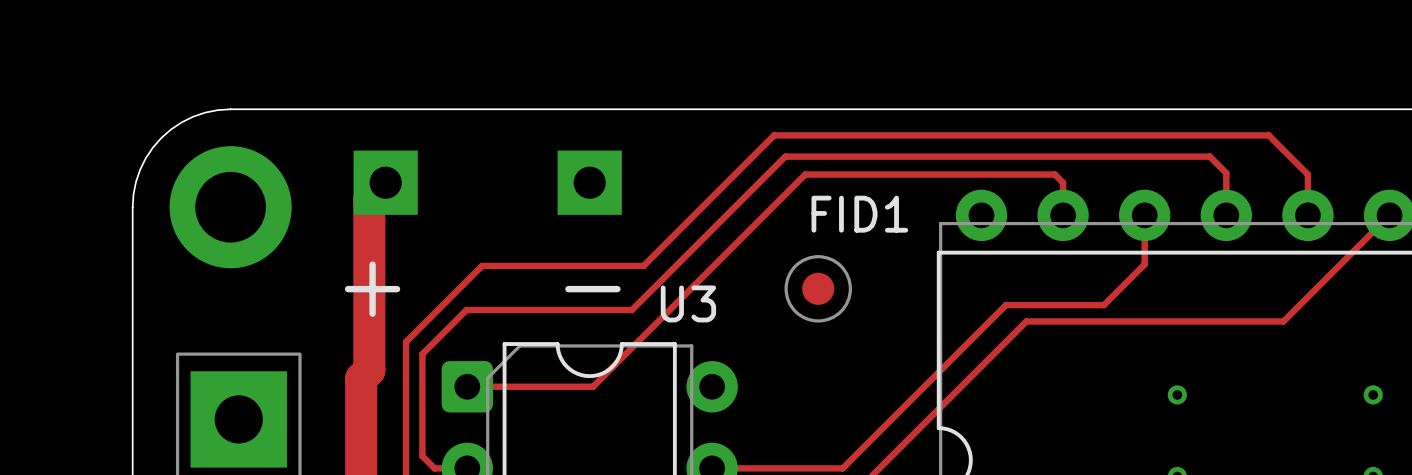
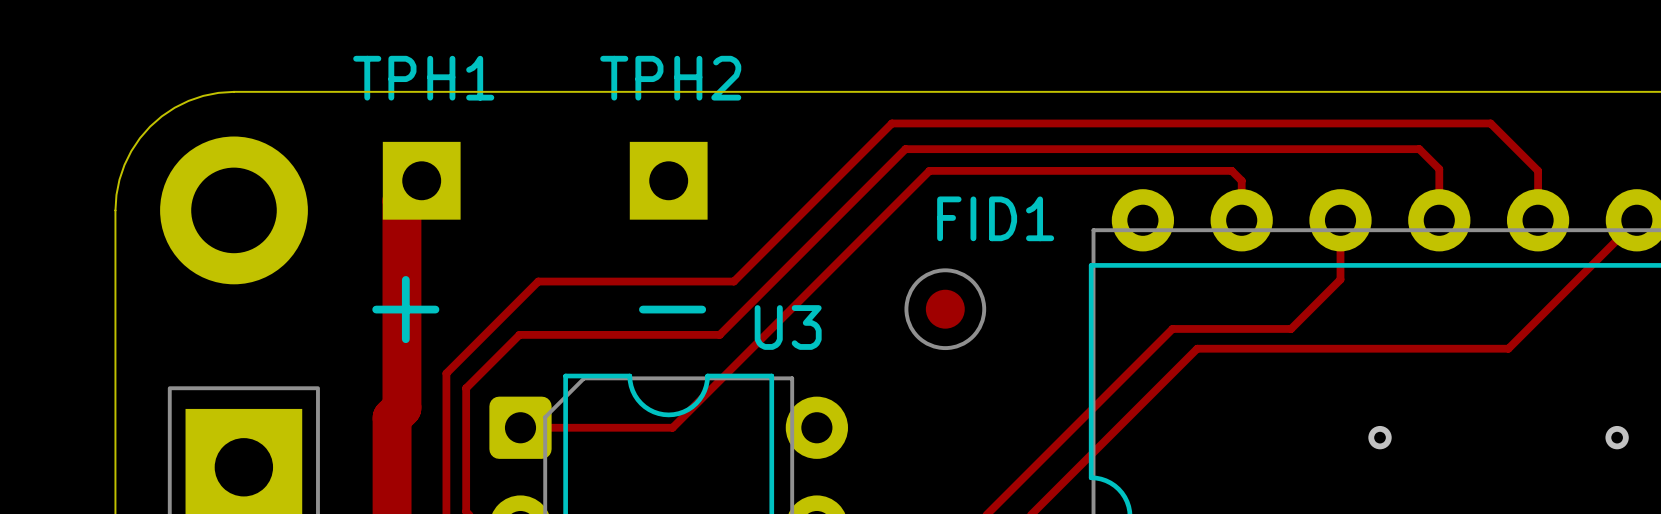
TPH1 name: none -> TPH1 (423, 78)
TPH2 name: none -> TPH2 (670, 78)

